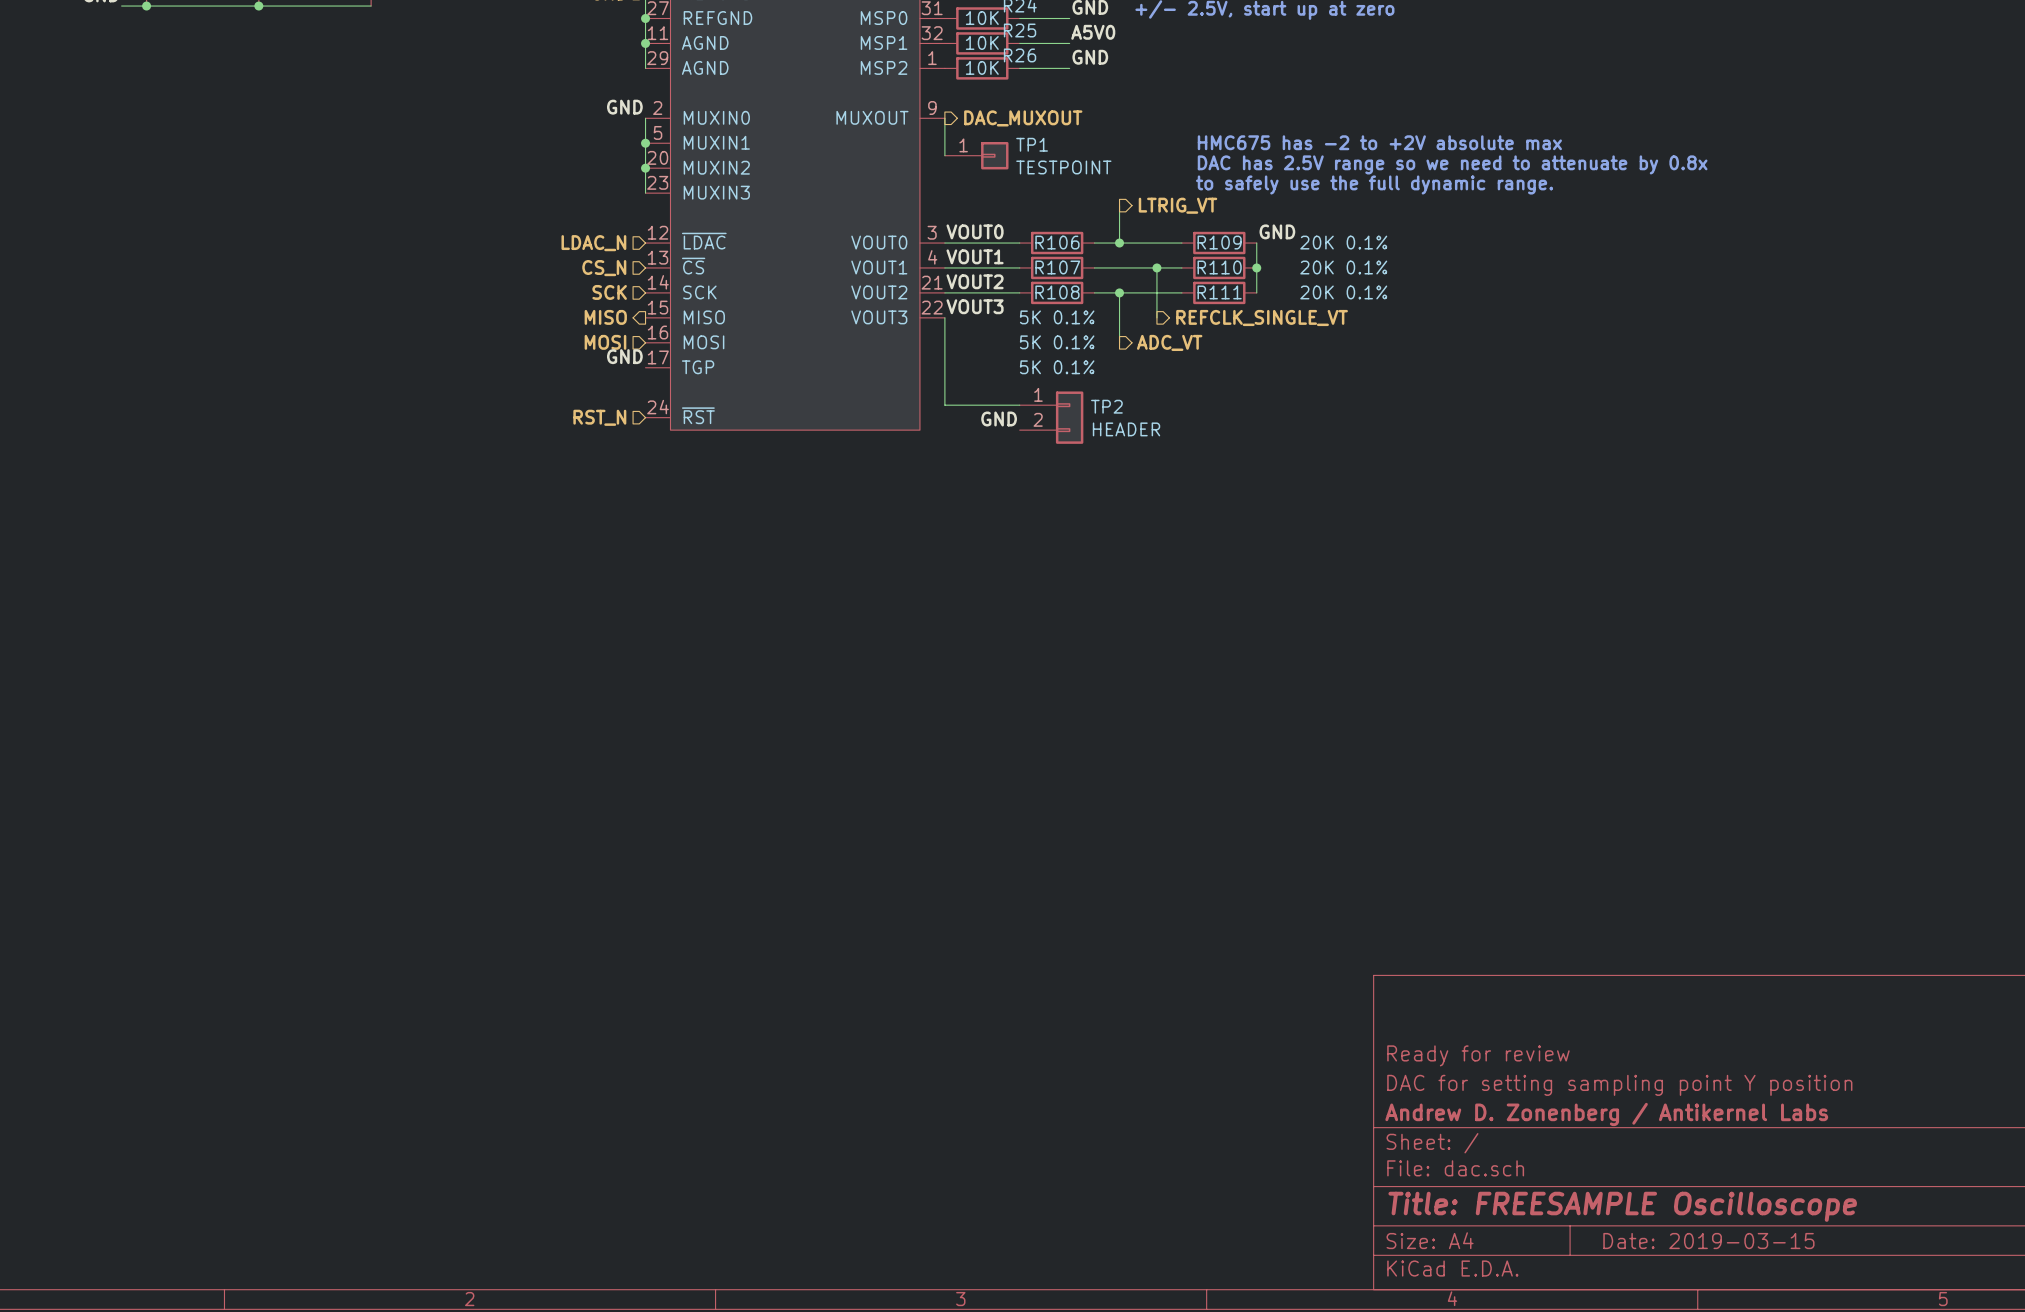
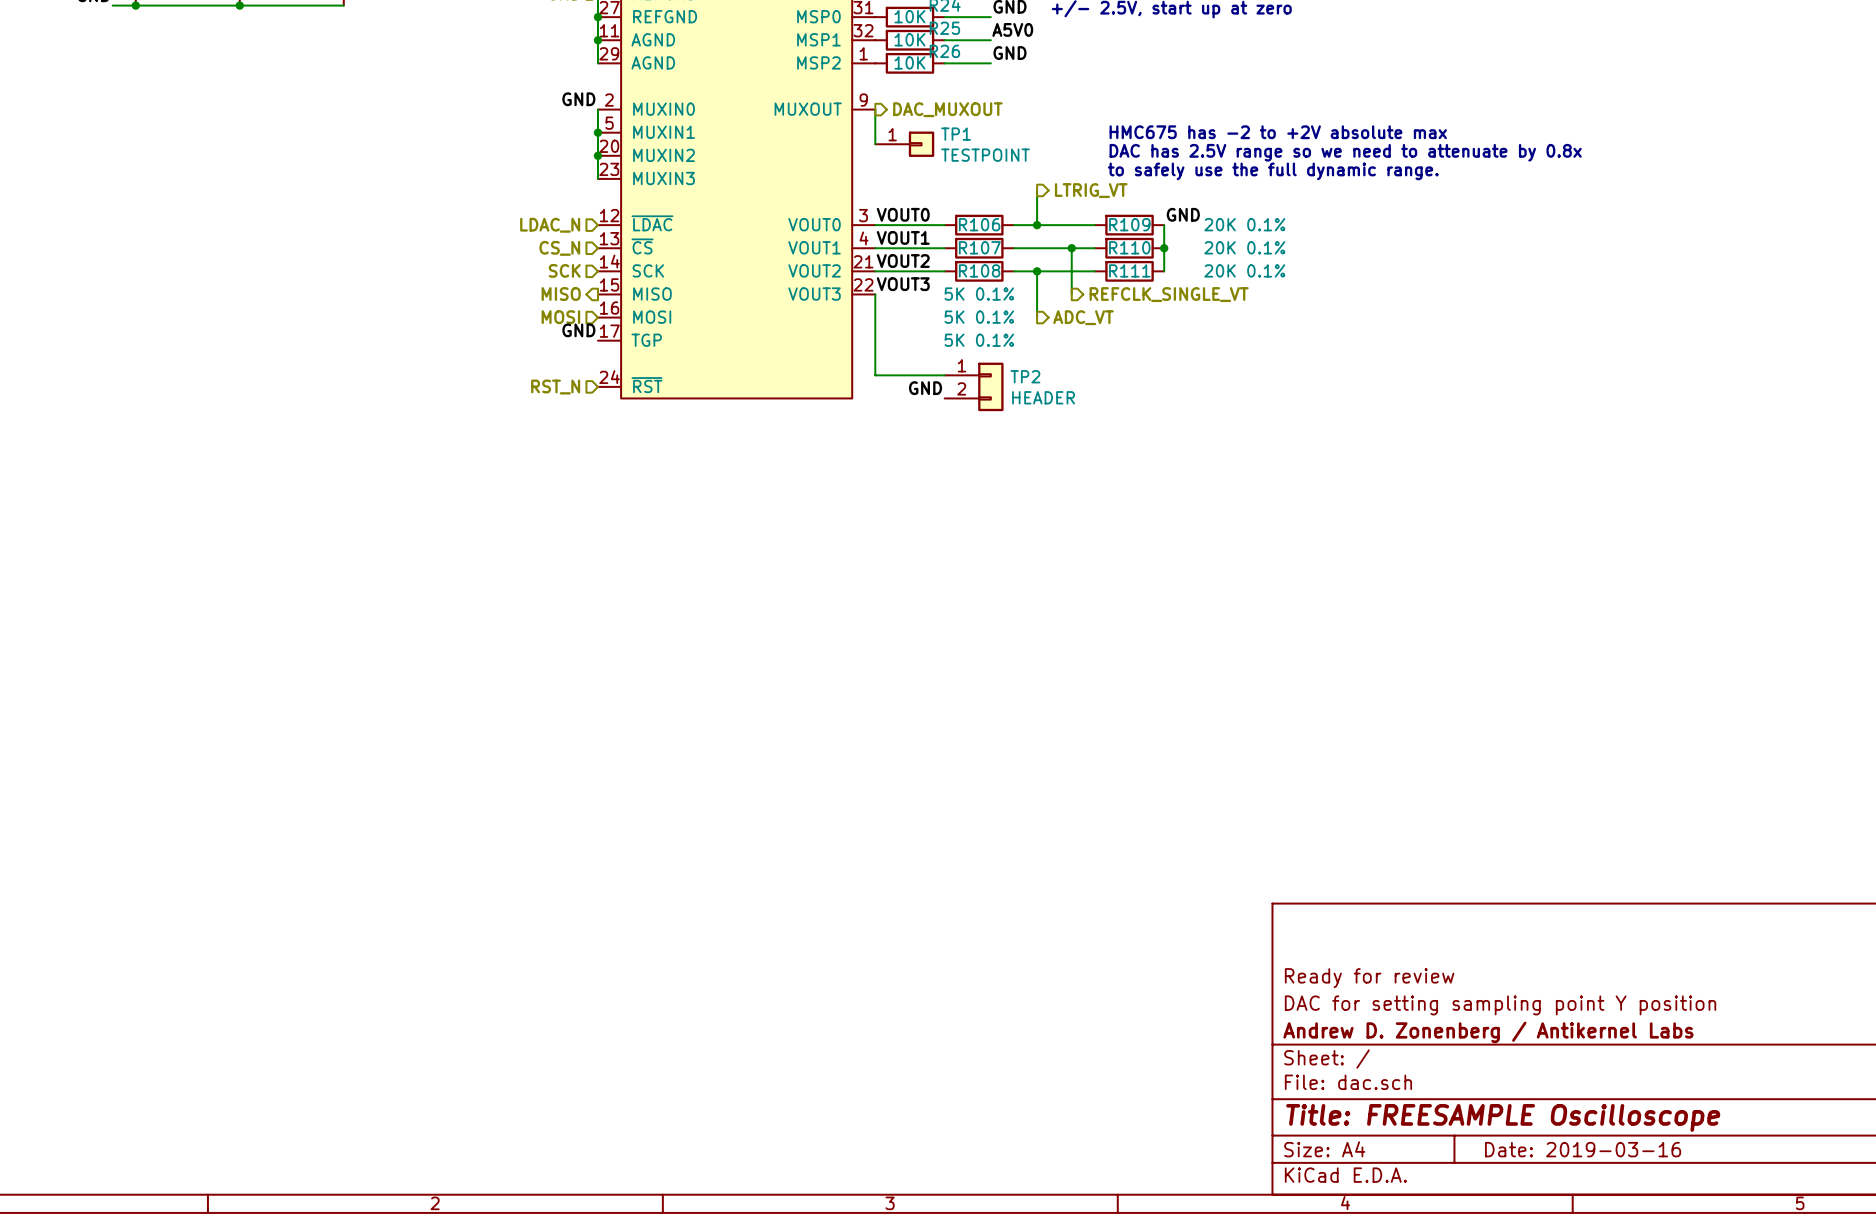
title block: Date: 2019-03-15 (1708, 1241) -> Date: 2019-03-16 (1583, 1149)

